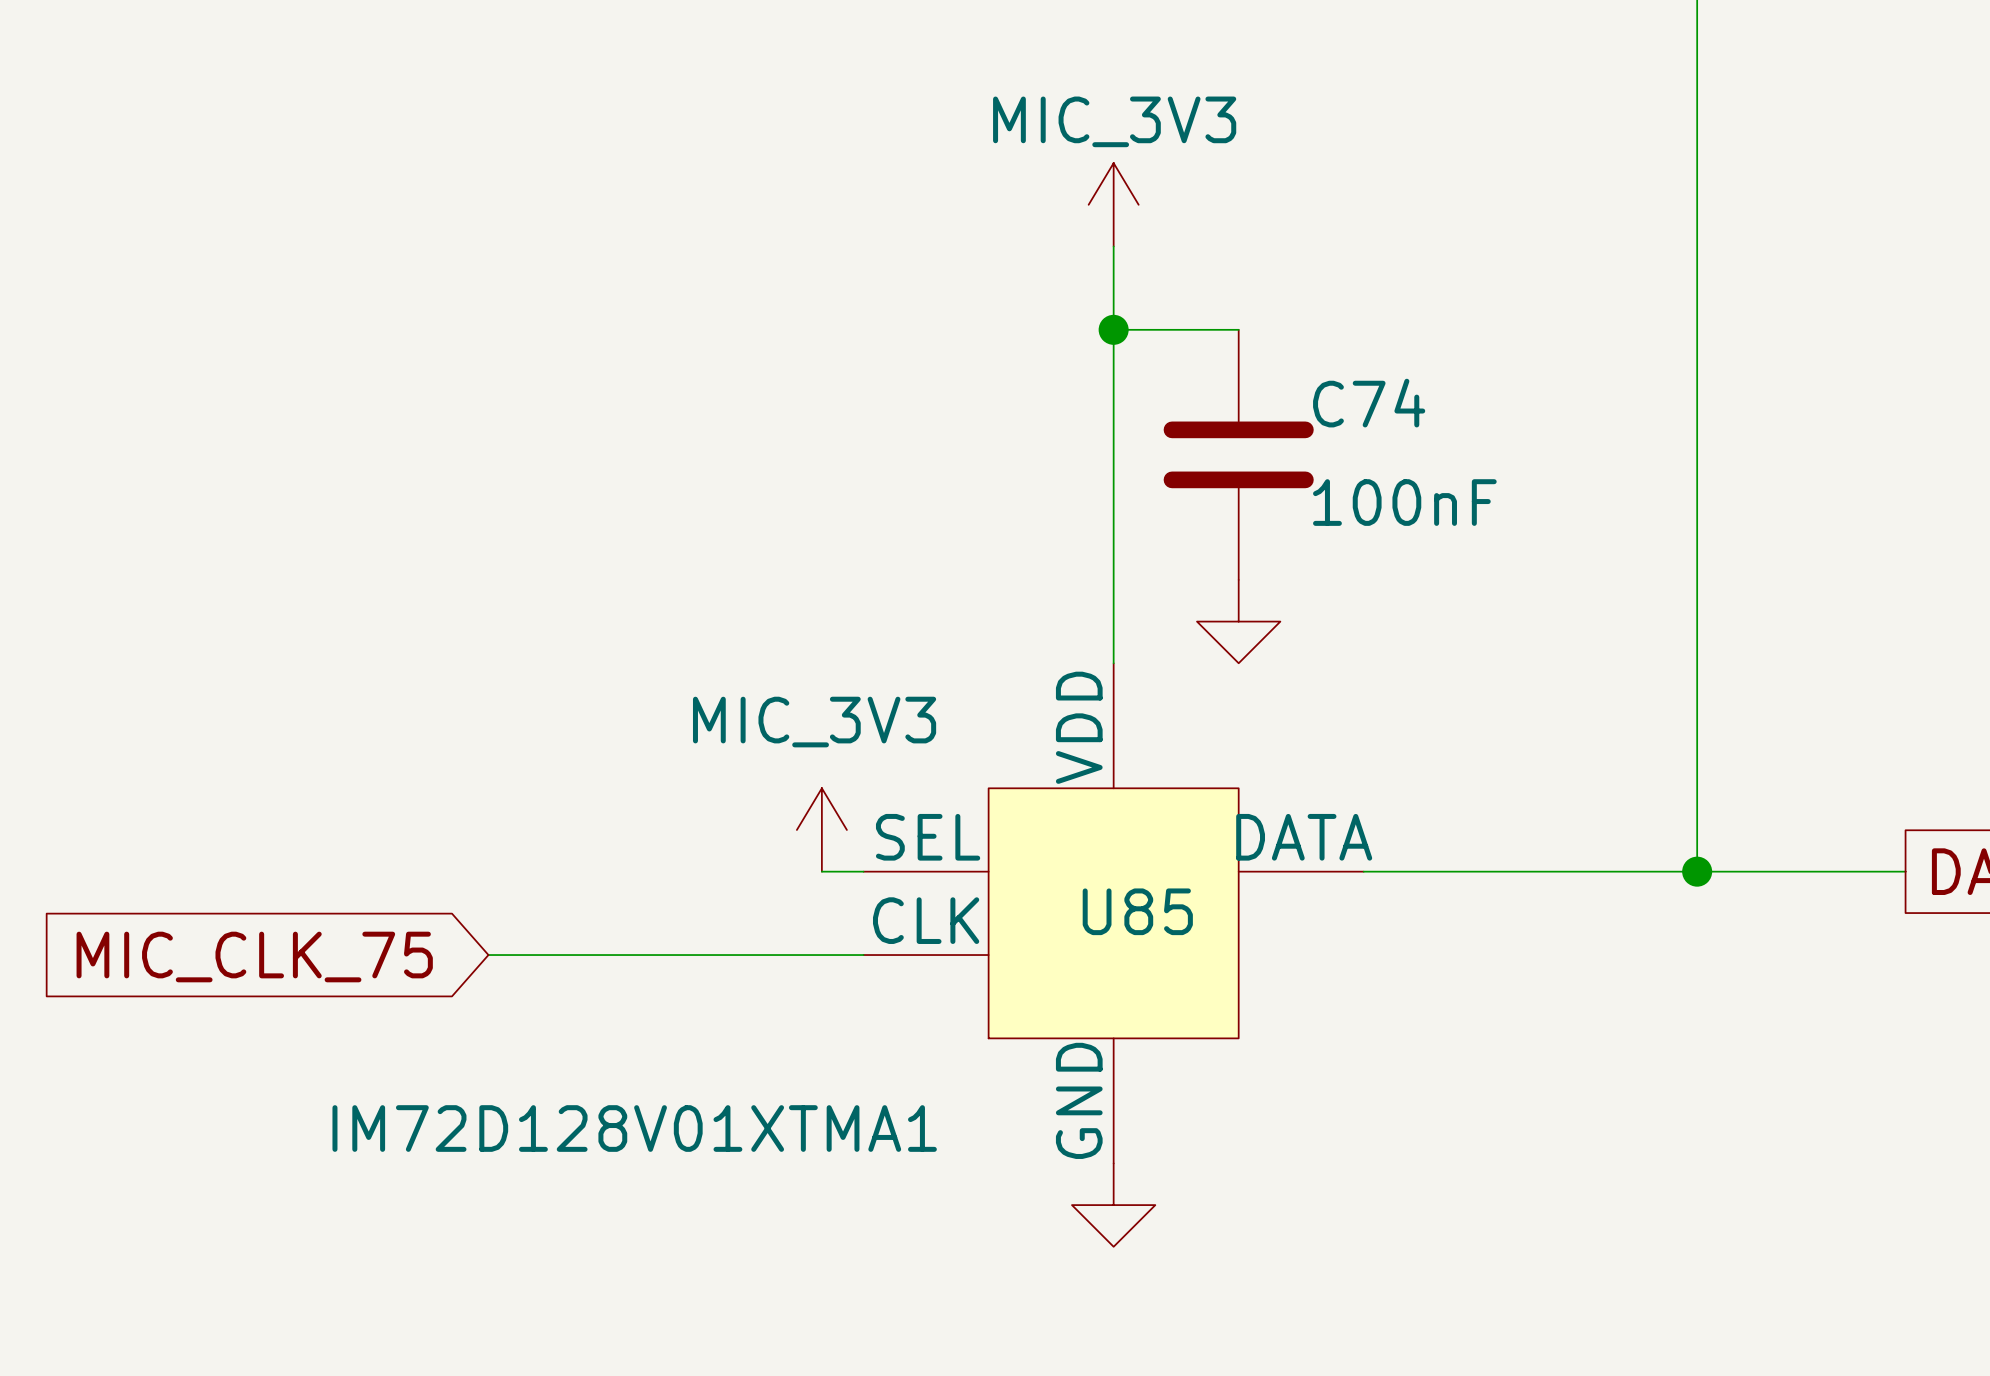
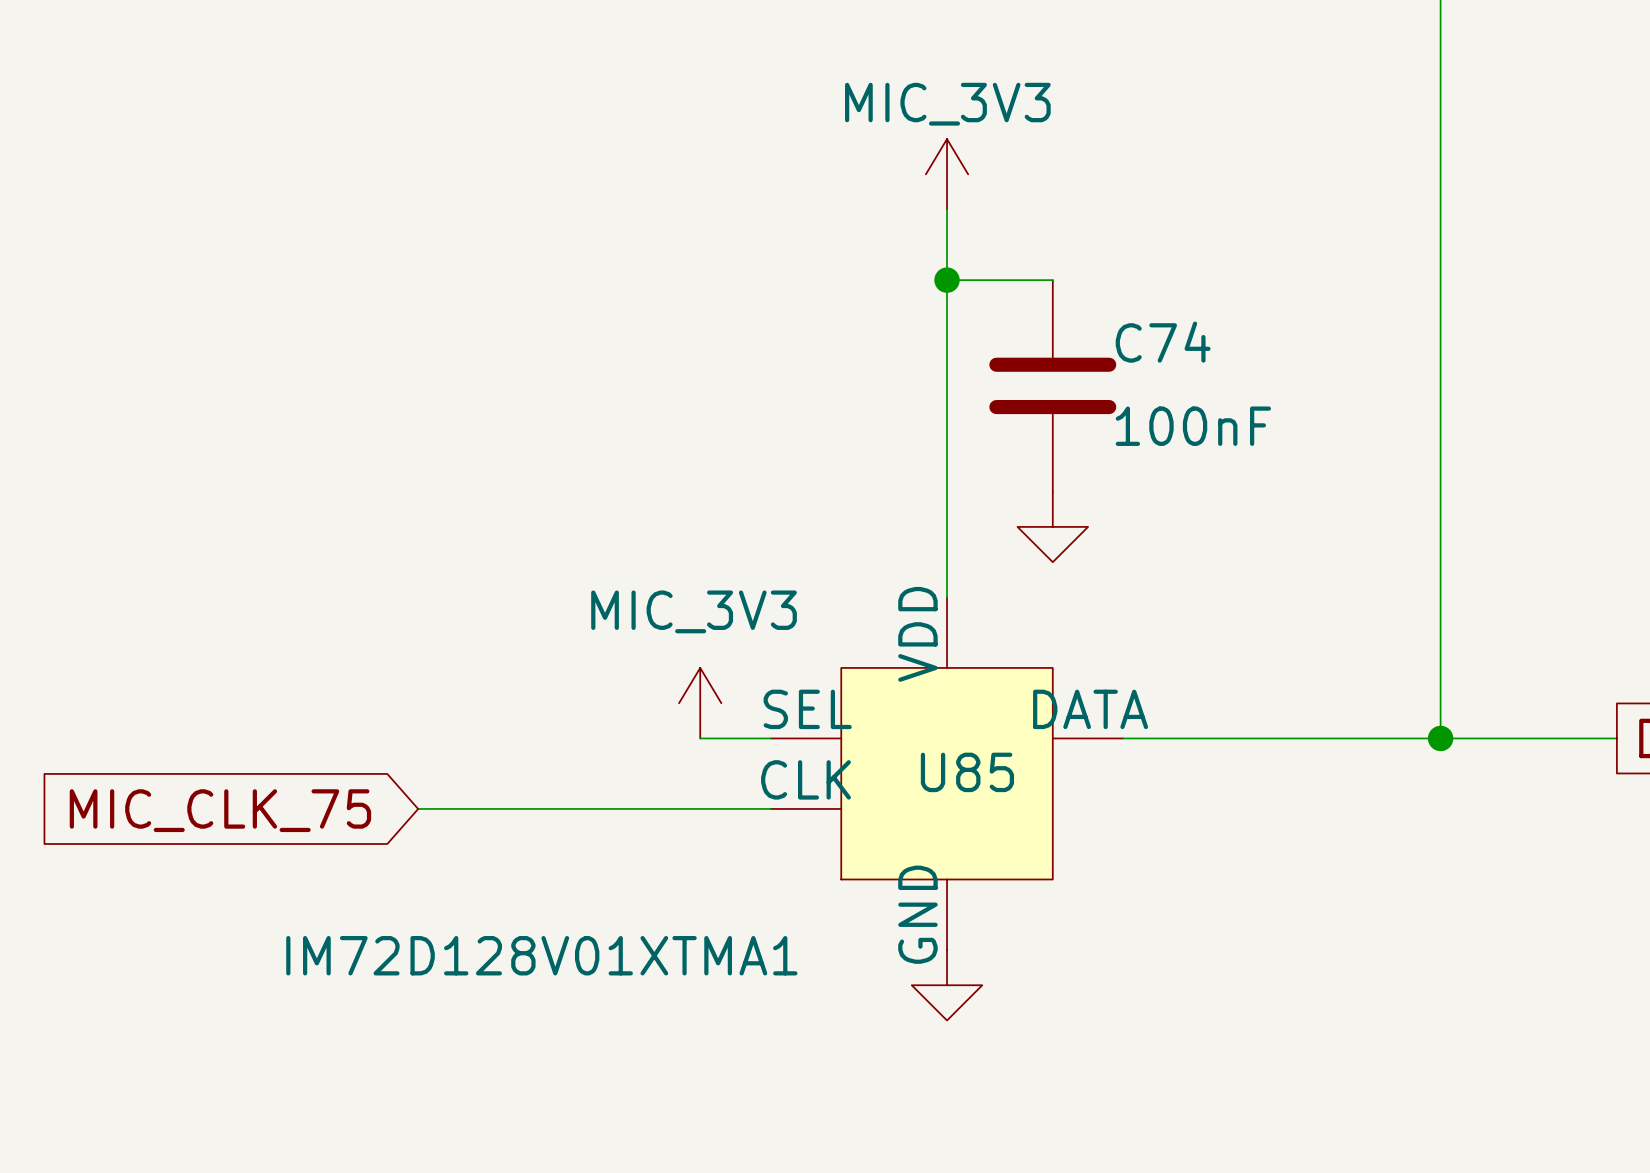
U85 symbol: [863, 663, 1364, 1164] -> [770, 597, 1124, 950]
power symbol position: (1113, 1205) -> (947, 985)

